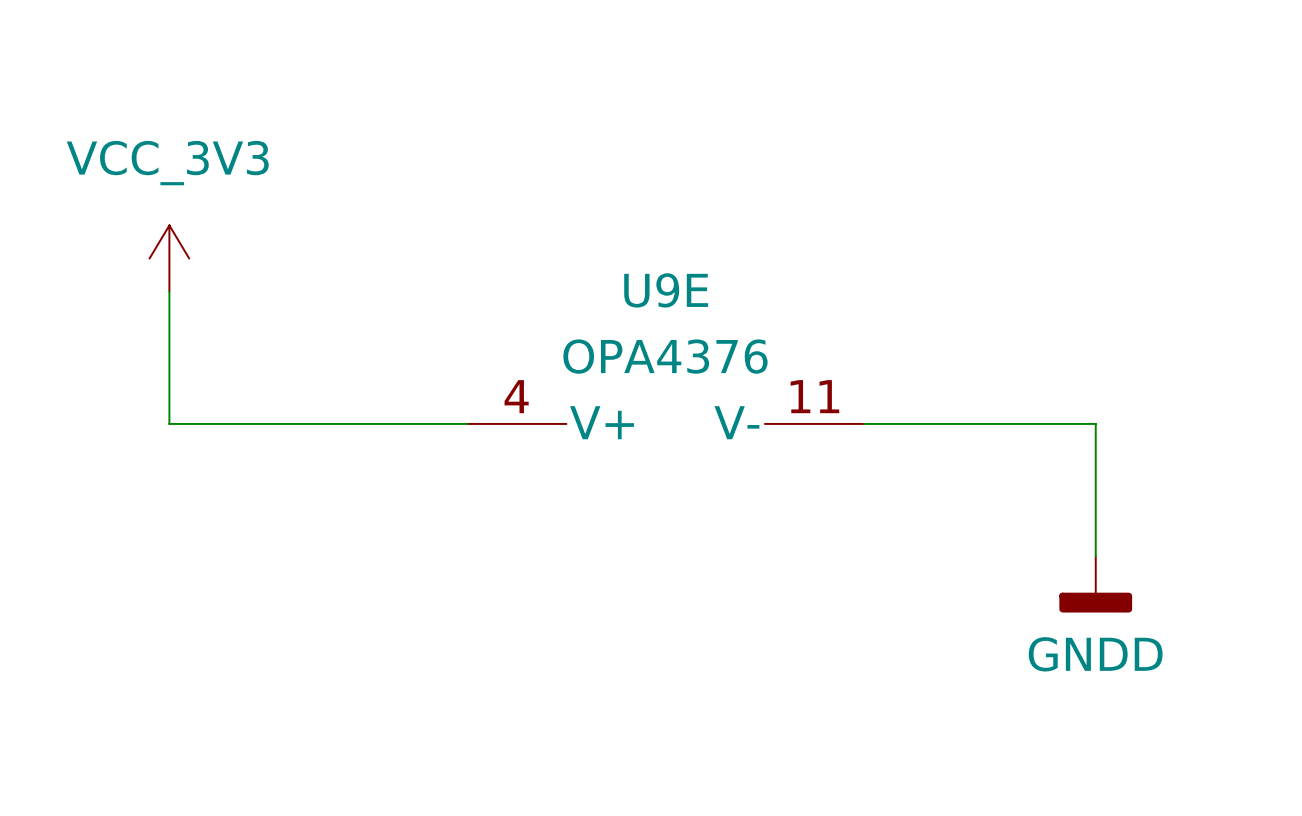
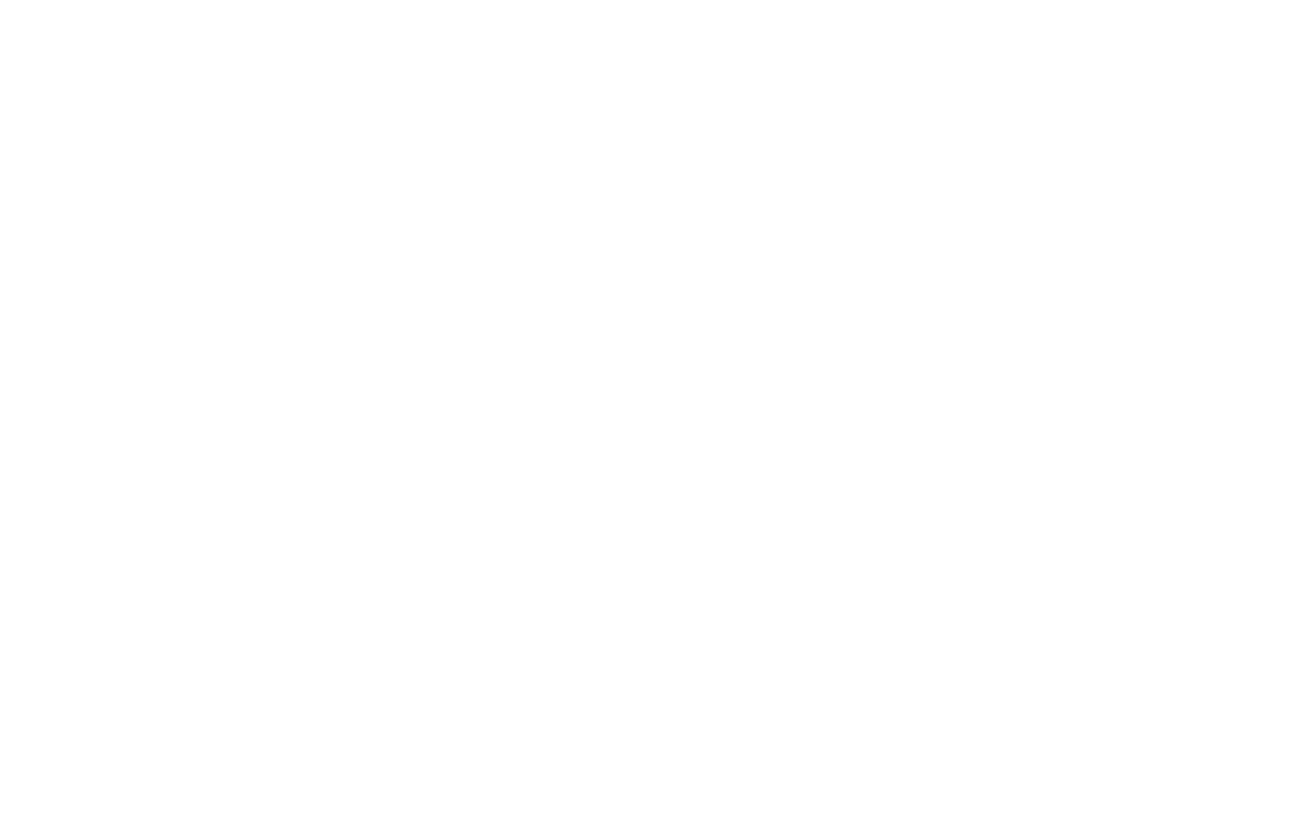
power symbol: VCC_3V3 (169, 258) -> none
wire: (169, 291) (169, 423) (467, 423) -> none
U9E: OPA4376 (665, 423) -> none
wire: (864, 423) (1095, 423) (1095, 556) -> none
power symbol: GNDD (1095, 584) -> none

